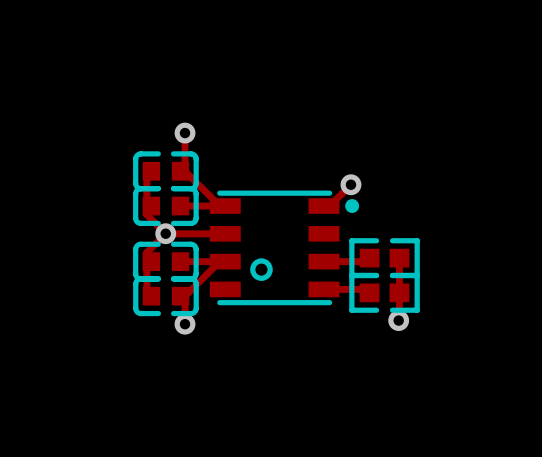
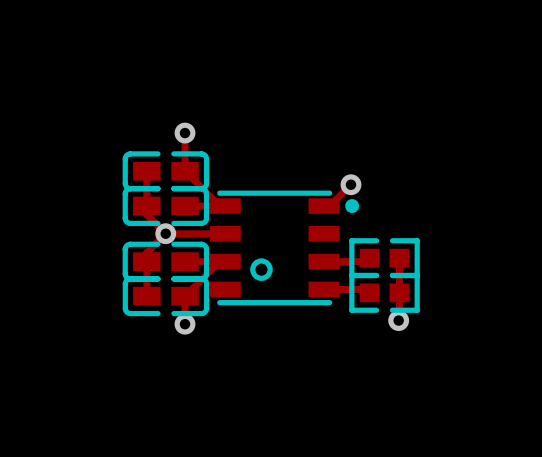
part footprint: [133, 151, 199, 192] -> [122, 151, 210, 192]
part footprint: [133, 186, 199, 227] -> [122, 186, 210, 227]
part footprint: [133, 241, 199, 282] -> [122, 241, 210, 282]
part footprint: [133, 276, 199, 317] -> [122, 276, 210, 317]

